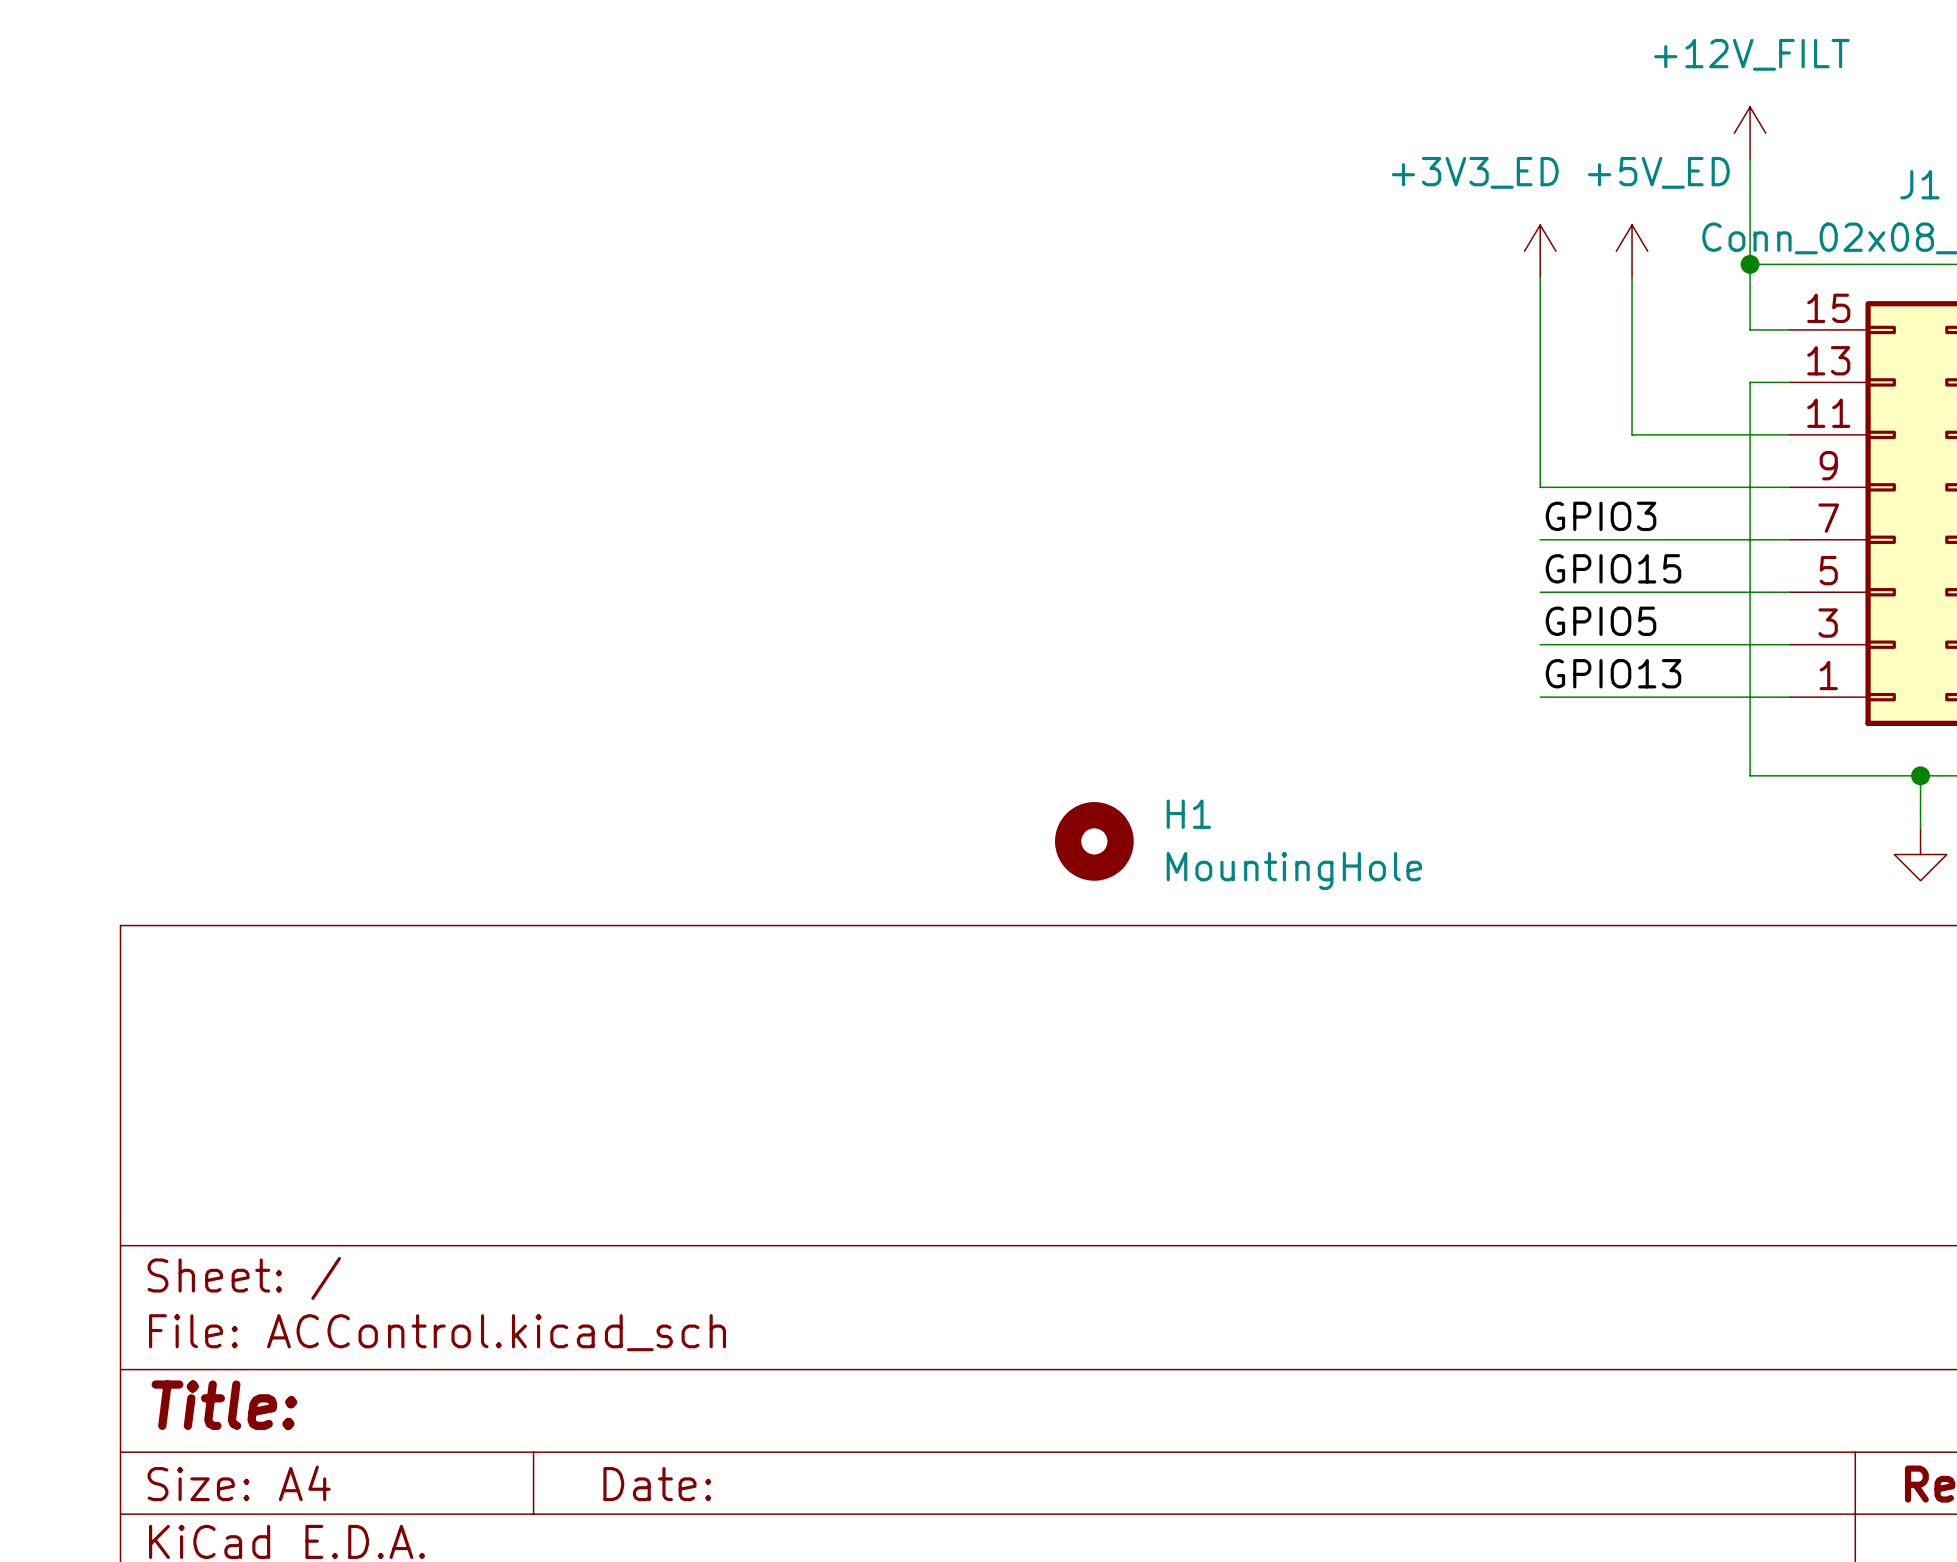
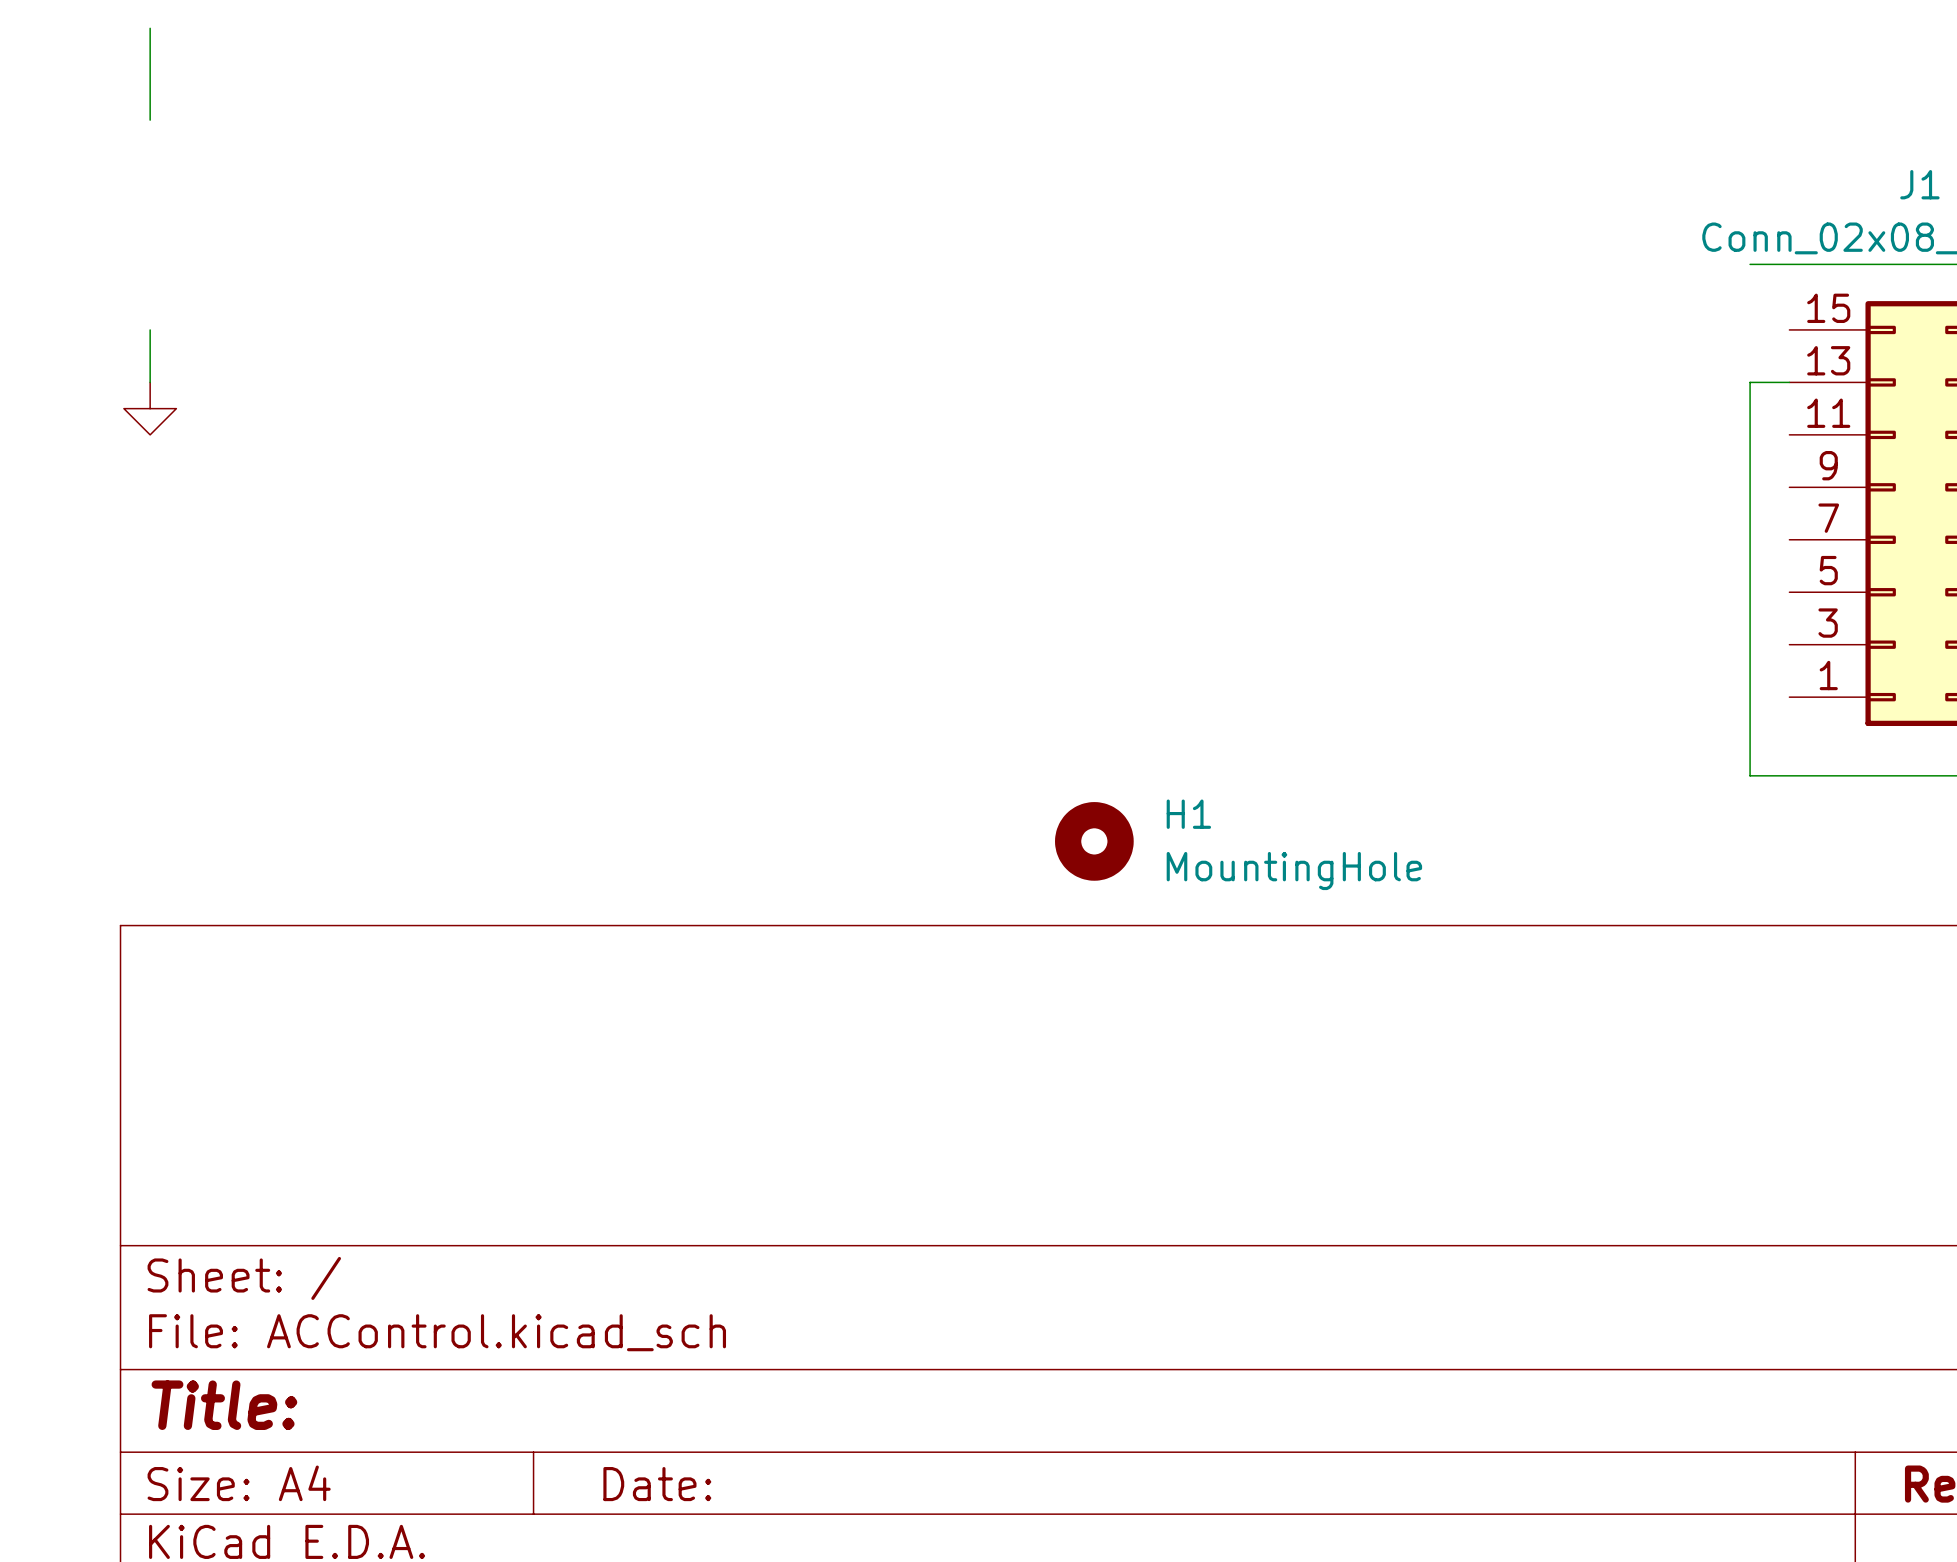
wire: none -> (150, 28) (150, 120)
power symbol: +12V_FILT (1750, 133) -> none
wire: (1750, 159) (1750, 329) (1789, 329) -> none
power symbol: +3V3_ED (1540, 251) -> none
power symbol: +5V_ED (1632, 251) -> none
junction: (1750, 264) -> none
wire: (1540, 277) (1540, 487) (1789, 487) -> none
wire: (1632, 277) (1632, 434) (1789, 434) -> none
wire: none -> (150, 329) (150, 382)
power symbol: none -> (150, 408)
label: GPIO3 (1601, 516) -> none
wire: (1540, 539) (1789, 539) -> none
label: GPIO15 (1613, 568) -> none
wire: (1540, 592) (1789, 592) -> none
label: GPIO5 (1601, 621) -> none
wire: (1540, 644) (1789, 644) -> none
label: GPIO13 (1613, 673) -> none
wire: (1540, 697) (1789, 697) -> none
wire: (1920, 775) (1920, 828) -> none
junction: (1920, 775) -> none
power symbol: (1920, 854) -> none

